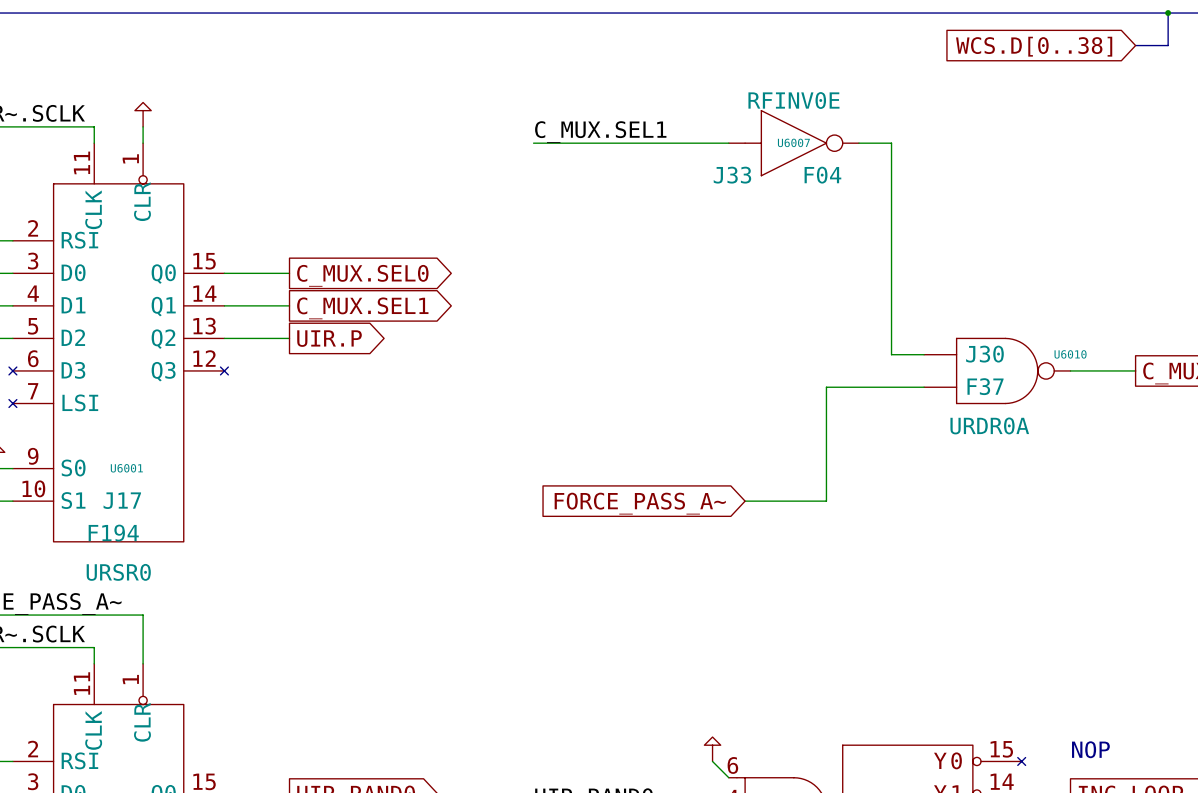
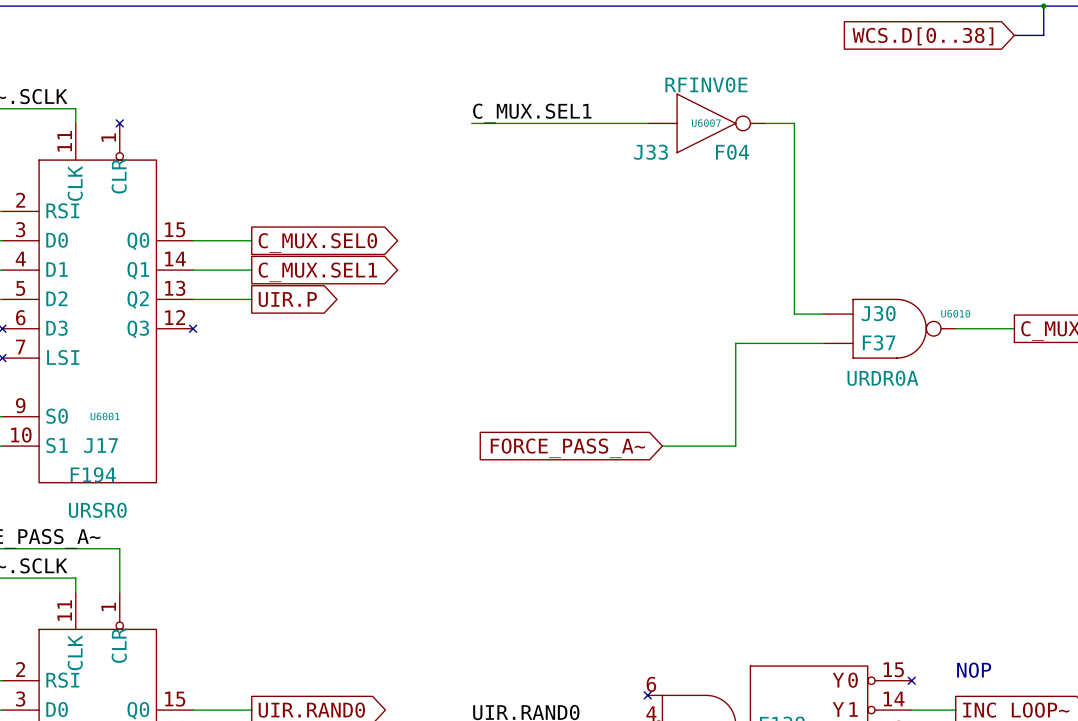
power symbol: (143, 114) -> none
wire: (143, 126) (143, 143) -> none
no-connect mark: none -> (119, 123)
power symbol: (712, 749) -> none
wire: (712, 761) (728, 777) -> none
no-connect mark: none -> (647, 695)

